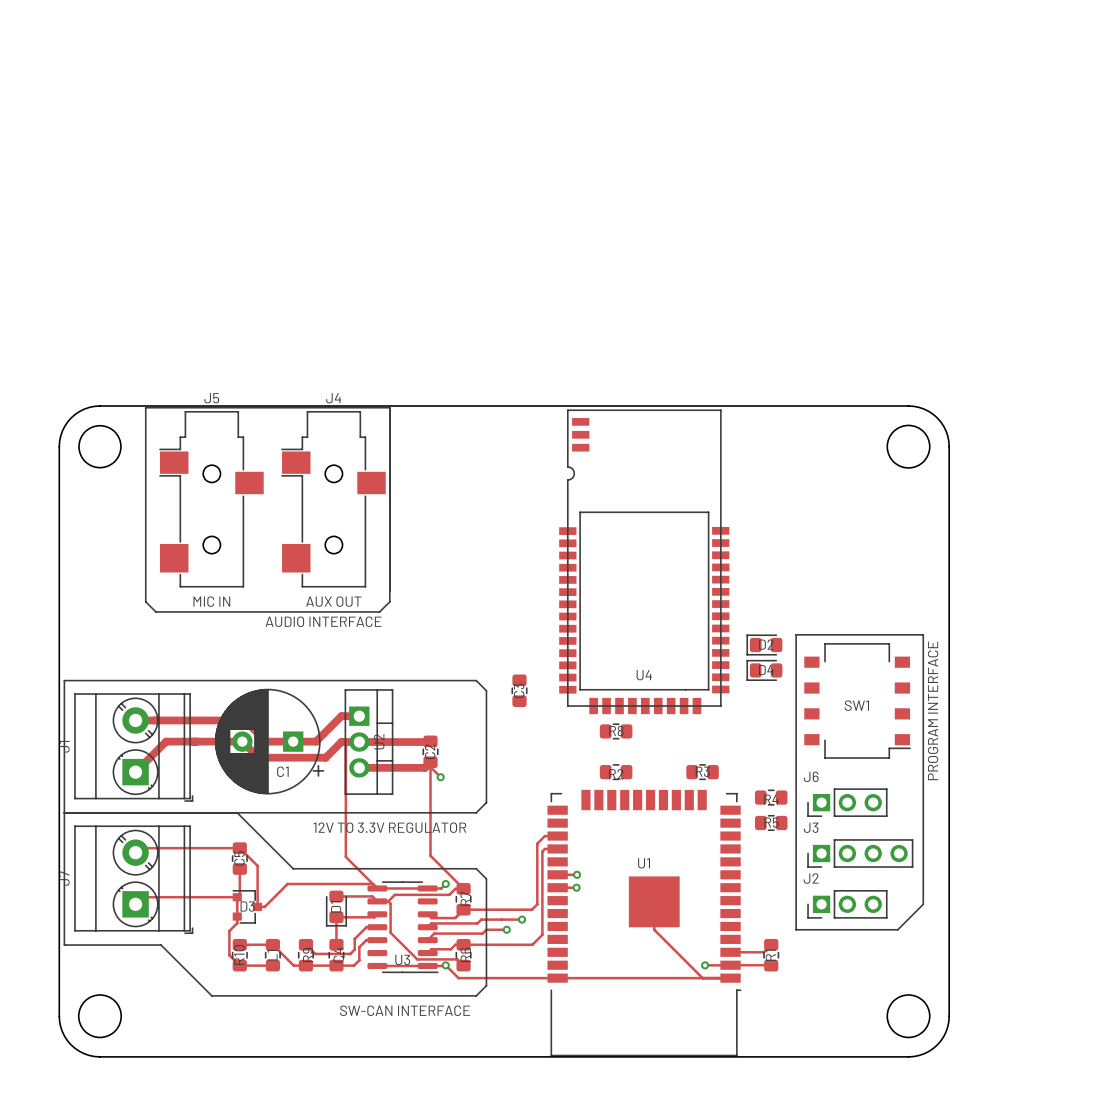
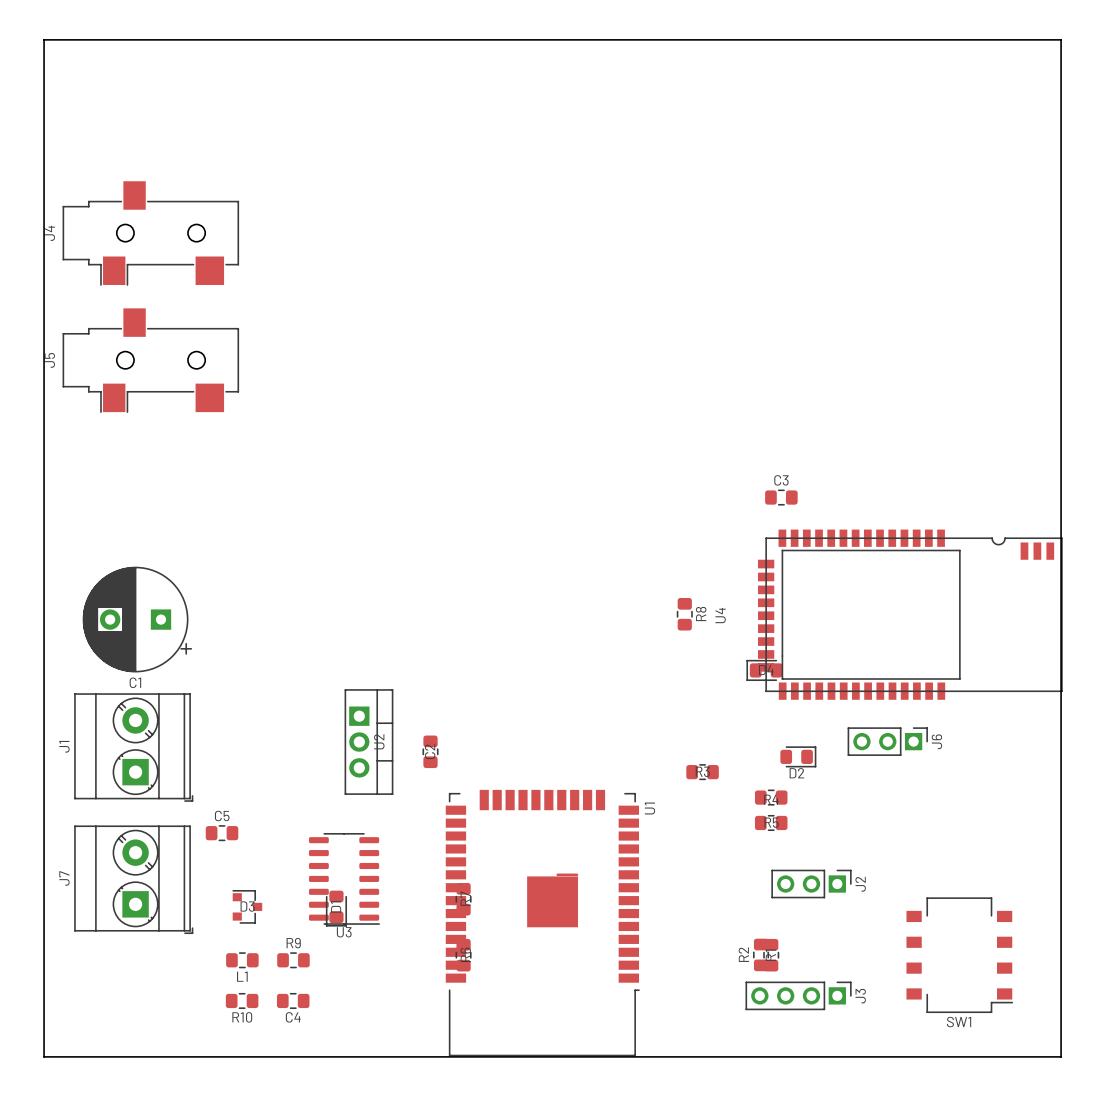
line: (145, 407) (145, 601) (155, 611) (379, 611) (389, 601) (389, 407) (145, 407) -> none
round board edge: [78, 425, 122, 468] -> none
round board edge: [887, 425, 931, 469] -> none
J5 rotation: 0° (211, 499) -> 90° counterclockwise (150, 360)
J5 position: (211, 499) -> (150, 360)
J4 rotation: 0° (333, 499) -> 90° counterclockwise (150, 233)
J4 position: (333, 499) -> (150, 233)
U4 rotation: 0° (644, 561) -> 90° clockwise (910, 614)
U4 position: (644, 561) -> (910, 614)
J5 value: MIC IN (211, 601) -> none
J4 value: AUX OUT (333, 601) -> none
text: AUDIO INTERFACE (323, 621) -> none
line: (796, 634) (796, 929) (897, 929) (923, 904) (923, 634) (796, 634) -> none
D2 rotation: 0° (764, 645) -> 180° (798, 756)
D2 position: (764, 645) -> (798, 756)
U4 name position: U4 (644, 675) -> U4 (720, 615)
C3 rotation: 0° (519, 690) -> 90° clockwise (781, 497)
C3 position: (519, 690) -> (781, 497)
SW1 position: (857, 700) -> (959, 955)
SW1 name position: SW1 (856, 705) -> SW1 (959, 1022)
text: PROGRAM INTERFACE (933, 710) -> none
track: (359, 716) (341, 716) (315, 741) (266, 741) (245, 720) (135, 720) -> none
R8 rotation: 0° (616, 731) -> 90° clockwise (684, 614)
R8 position: (616, 731) -> (684, 614)
C1 position: (269, 741) -> (137, 619)
track: (430, 741) (341, 742) (325, 757) (258, 757) (242, 741) (166, 741) (135, 772) -> none
track: (359, 742) (345, 742) (345, 856) (377, 888) (441, 888) (445, 884) -> none
track: (359, 767) (424, 767) (430, 762) (430, 855) (463, 888) (455, 888) (449, 894) (394, 894) (388, 901) -> none
track: (430, 767) (440, 777) -> none
C1 name position: C1 (282, 771) -> C1 (135, 682)
R2 rotation: 0° (616, 772) -> 90° clockwise (761, 954)
R2 position: (616, 772) -> (761, 954)
J6 name position: J6 (811, 776) -> J6 (936, 741)
via: (440, 777) -> none
J6 rotation: 0° (847, 802) -> 180° (887, 741)
J6 position: (847, 802) -> (887, 741)
line: (64, 812) (476, 812) (486, 802) (486, 690) (476, 680) (64, 680) (64, 945) (161, 945) (211, 995) (476, 995) (486, 985) (486, 878) (476, 868) (293, 868) (237, 812) -> none
text: 12V TO 3.3V REGULATOR (389, 827) -> none
J3 name position: J3 (811, 827) -> J3 (860, 996)
track: (557, 836) (544, 836) (537, 843) (537, 904) (531, 909) (463, 909) (455, 918) (431, 918) (427, 914) -> none
track: (557, 848) (544, 848) (542, 851) (542, 934) (532, 944) (455, 944) (450, 949) (431, 949) (427, 953) -> none
track: (135, 852) (140, 848) (239, 848) (257, 865) (257, 906) (264, 906) (287, 884) (372, 884) -> none
J3 rotation: 0° (860, 853) -> 180° (798, 995)
J3 position: (860, 853) -> (798, 995)
C5 rotation: 0° (239, 858) -> 90° clockwise (222, 833)
C5 position: (239, 858) -> (222, 833)
U1 name rotation: 0° (644, 863) -> 90° counterclockwise (649, 808)
U1 name position: U1 (644, 863) -> U1 (649, 808)
track: (239, 869) (239, 894) (237, 897) -> none
via: (577, 874) -> none
J2 name position: J2 (811, 878) -> J2 (860, 884)
via: (445, 884) -> none
via: (576, 887) -> none
track: (336, 896) (372, 896) (377, 901) (388, 901) -> none
track: (237, 897) (237, 923) (229, 931) (229, 955) (239, 965) (272, 965) -> none
track: (237, 897) (142, 897) (135, 904) -> none
track: (388, 901) (390, 903) (390, 932) (417, 959) (457, 959) (463, 965) -> none
track: (654, 901) (654, 929) (702, 978) -> none
J2 rotation: 0° (847, 904) -> 180° (811, 884)
track: (377, 914) (374, 917) (336, 917) (336, 944) -> none
track: (522, 919) (481, 919) (477, 923) (431, 923) (427, 927) -> none
via: (522, 919) -> none
U1 position: (644, 923) -> (542, 923)
track: (377, 927) (366, 927) (354, 938) (354, 949) (350, 953) (315, 953) (305, 944) -> none
U3 position: (402, 927) -> (344, 878)
track: (506, 929) (486, 929) (482, 933) (434, 933) (427, 940) -> none
via: (506, 929) -> none
track: (377, 940) (366, 940) (359, 947) (359, 960) (353, 965) (293, 965) (272, 944) (239, 944) -> none
track: (771, 944) (763, 952) (730, 952) -> none
R10 rotation: 0° (239, 955) -> 90° clockwise (242, 1000)
R10 position: (239, 955) -> (242, 1000)
L1 rotation: 0° (272, 955) -> 90° clockwise (242, 960)
L1 position: (272, 955) -> (242, 960)
R9 rotation: 0° (305, 955) -> 90° clockwise (293, 960)
C4 rotation: 0° (336, 955) -> 90° clockwise (293, 1000)
C4 position: (336, 955) -> (293, 1000)
U3 name position: U3 (402, 959) -> U3 (344, 932)
track: (377, 965) (445, 965) (458, 978) (730, 978) -> none
via: (445, 965) -> none
track: (705, 965) (771, 965) -> none
via: (705, 965) -> none
round board edge: [78, 994, 122, 1038] -> none
round board edge: [887, 994, 931, 1038] -> none
text: SW-CAN INTERFACE (405, 1010) -> none
board edge: (99, 1056) (84, 1053) (71, 1044) (62, 1031) (59, 1016) (59, 441) (64, 426) (75, 414) (89, 407) (99, 406) (908, 406) (919, 407) (933, 414) (943, 426) (949, 446) (949, 1016) (946, 1031) (937, 1044) (924, 1053) (908, 1056) -> (99, 1056) (44, 1056) (44, 39) (1061, 39) (1061, 1056) (908, 1056)

